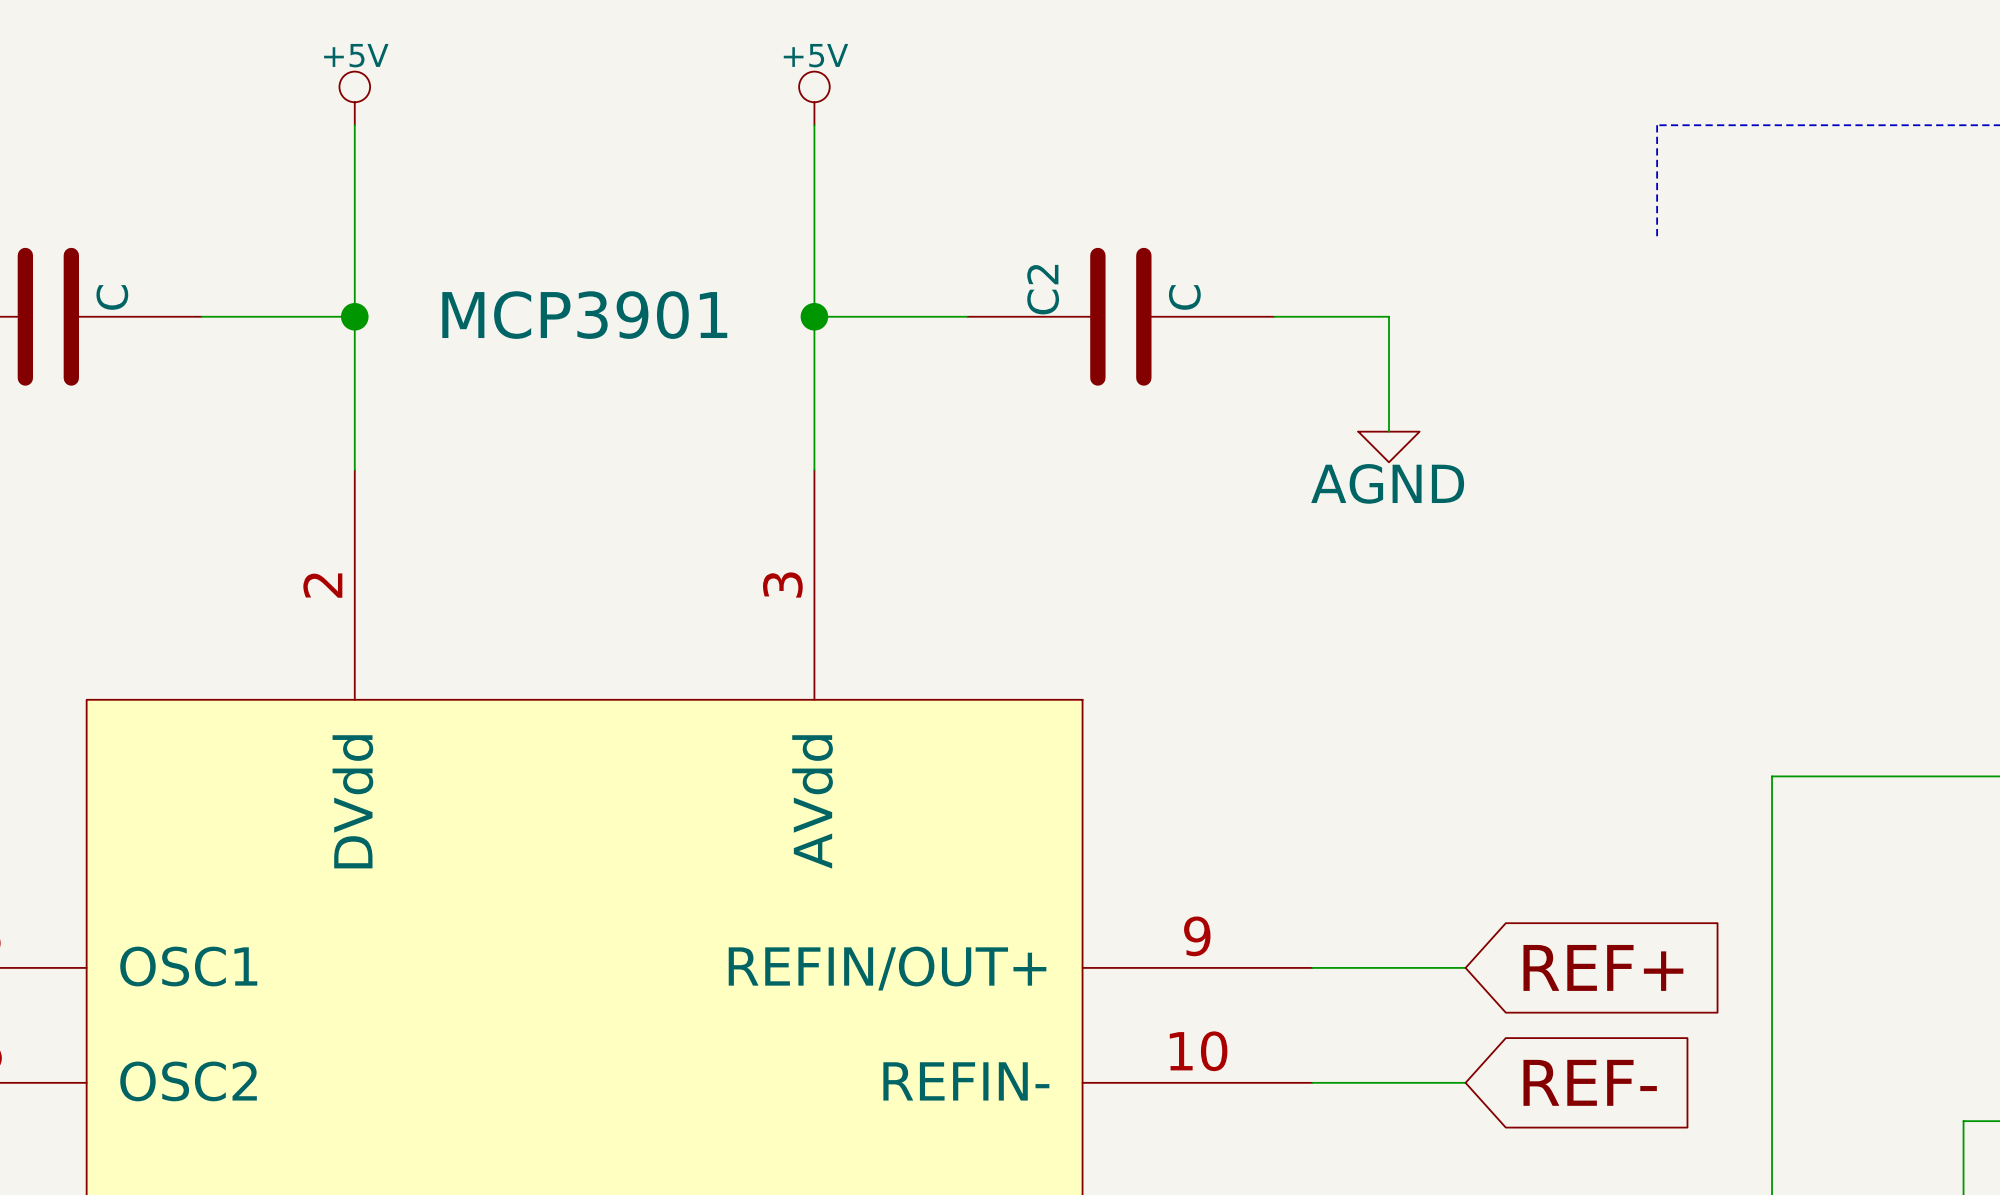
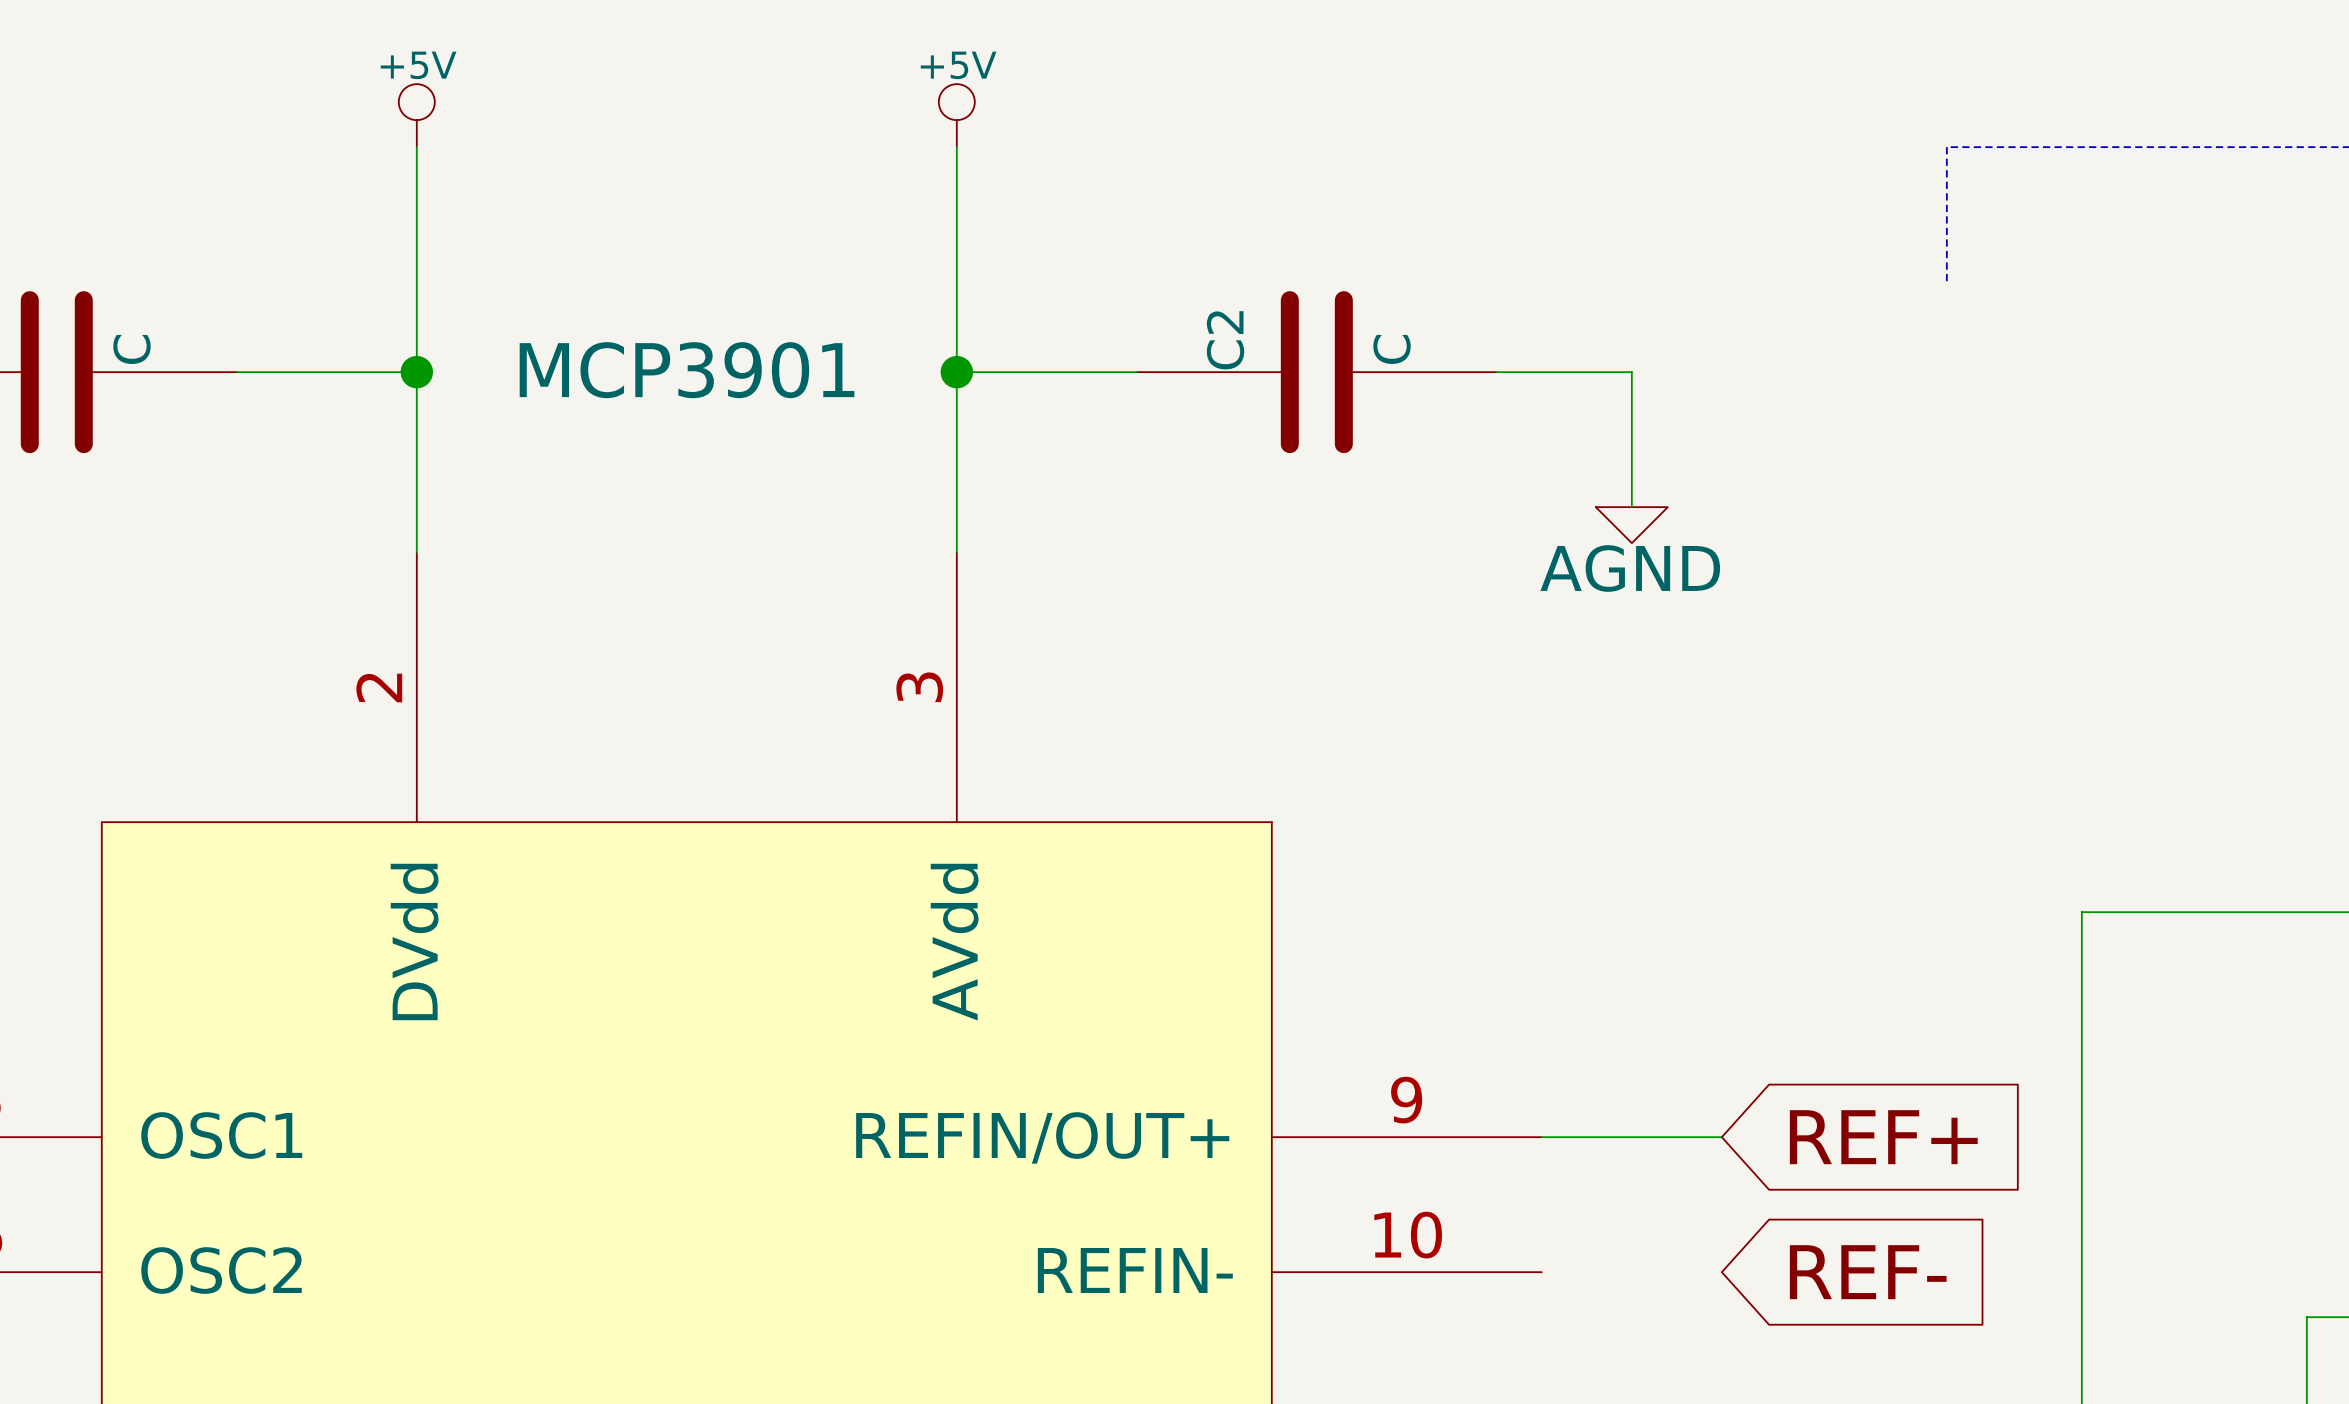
wire: (1312, 1082) (1465, 1082) -> none

